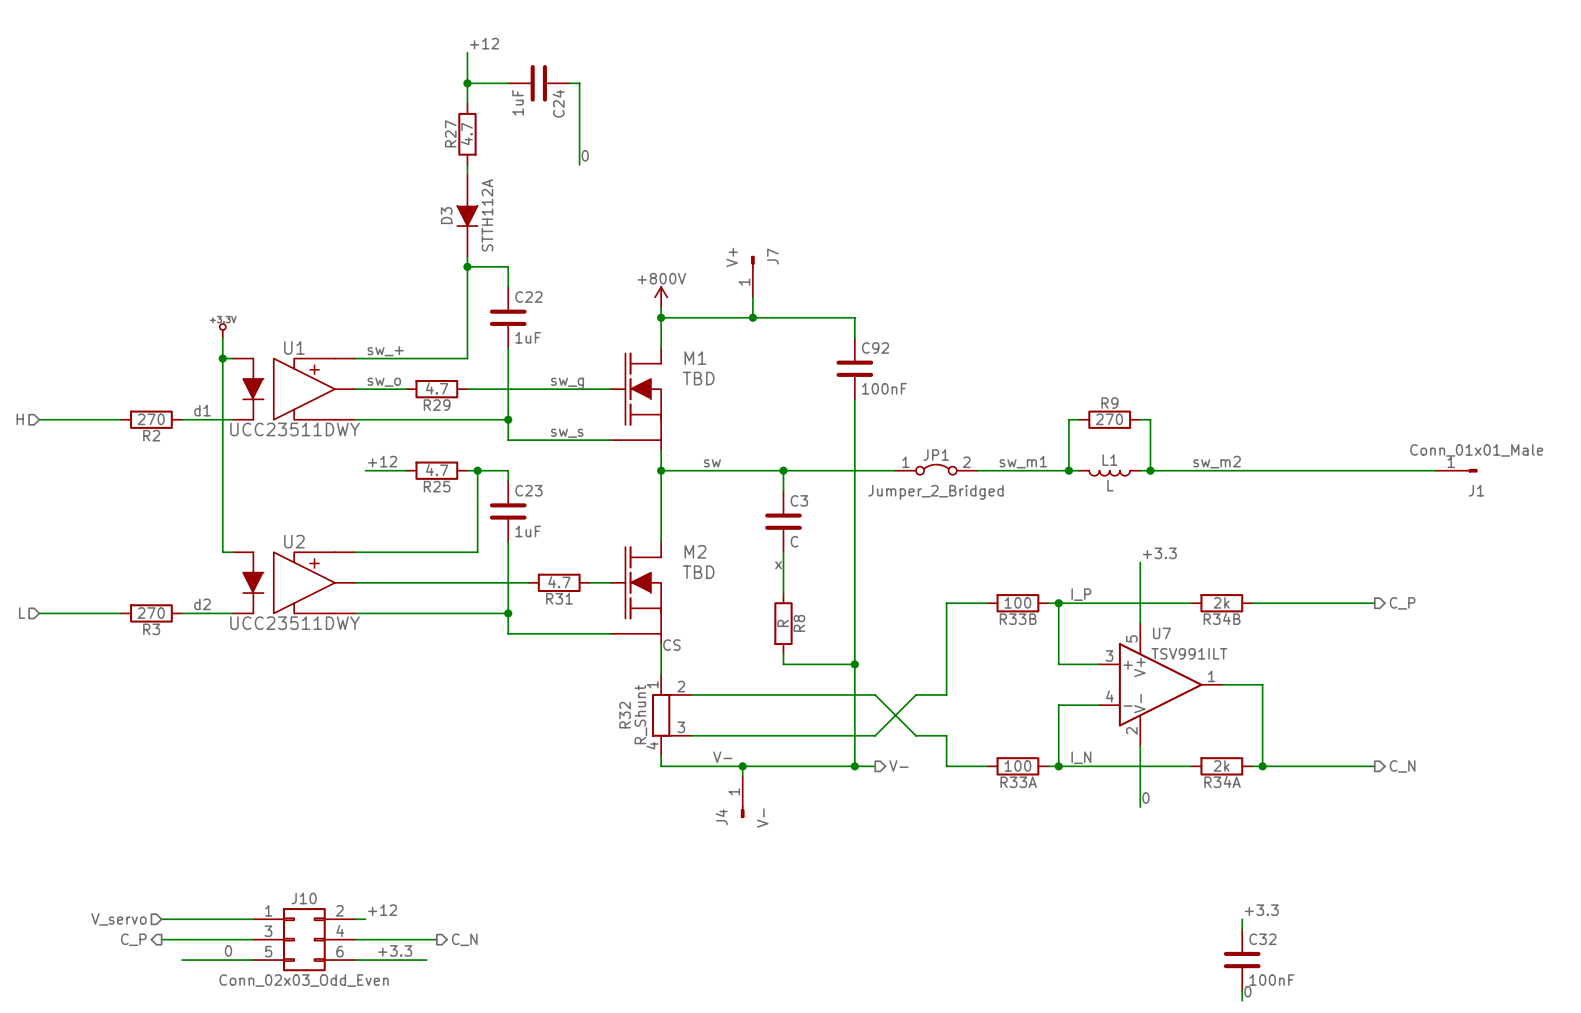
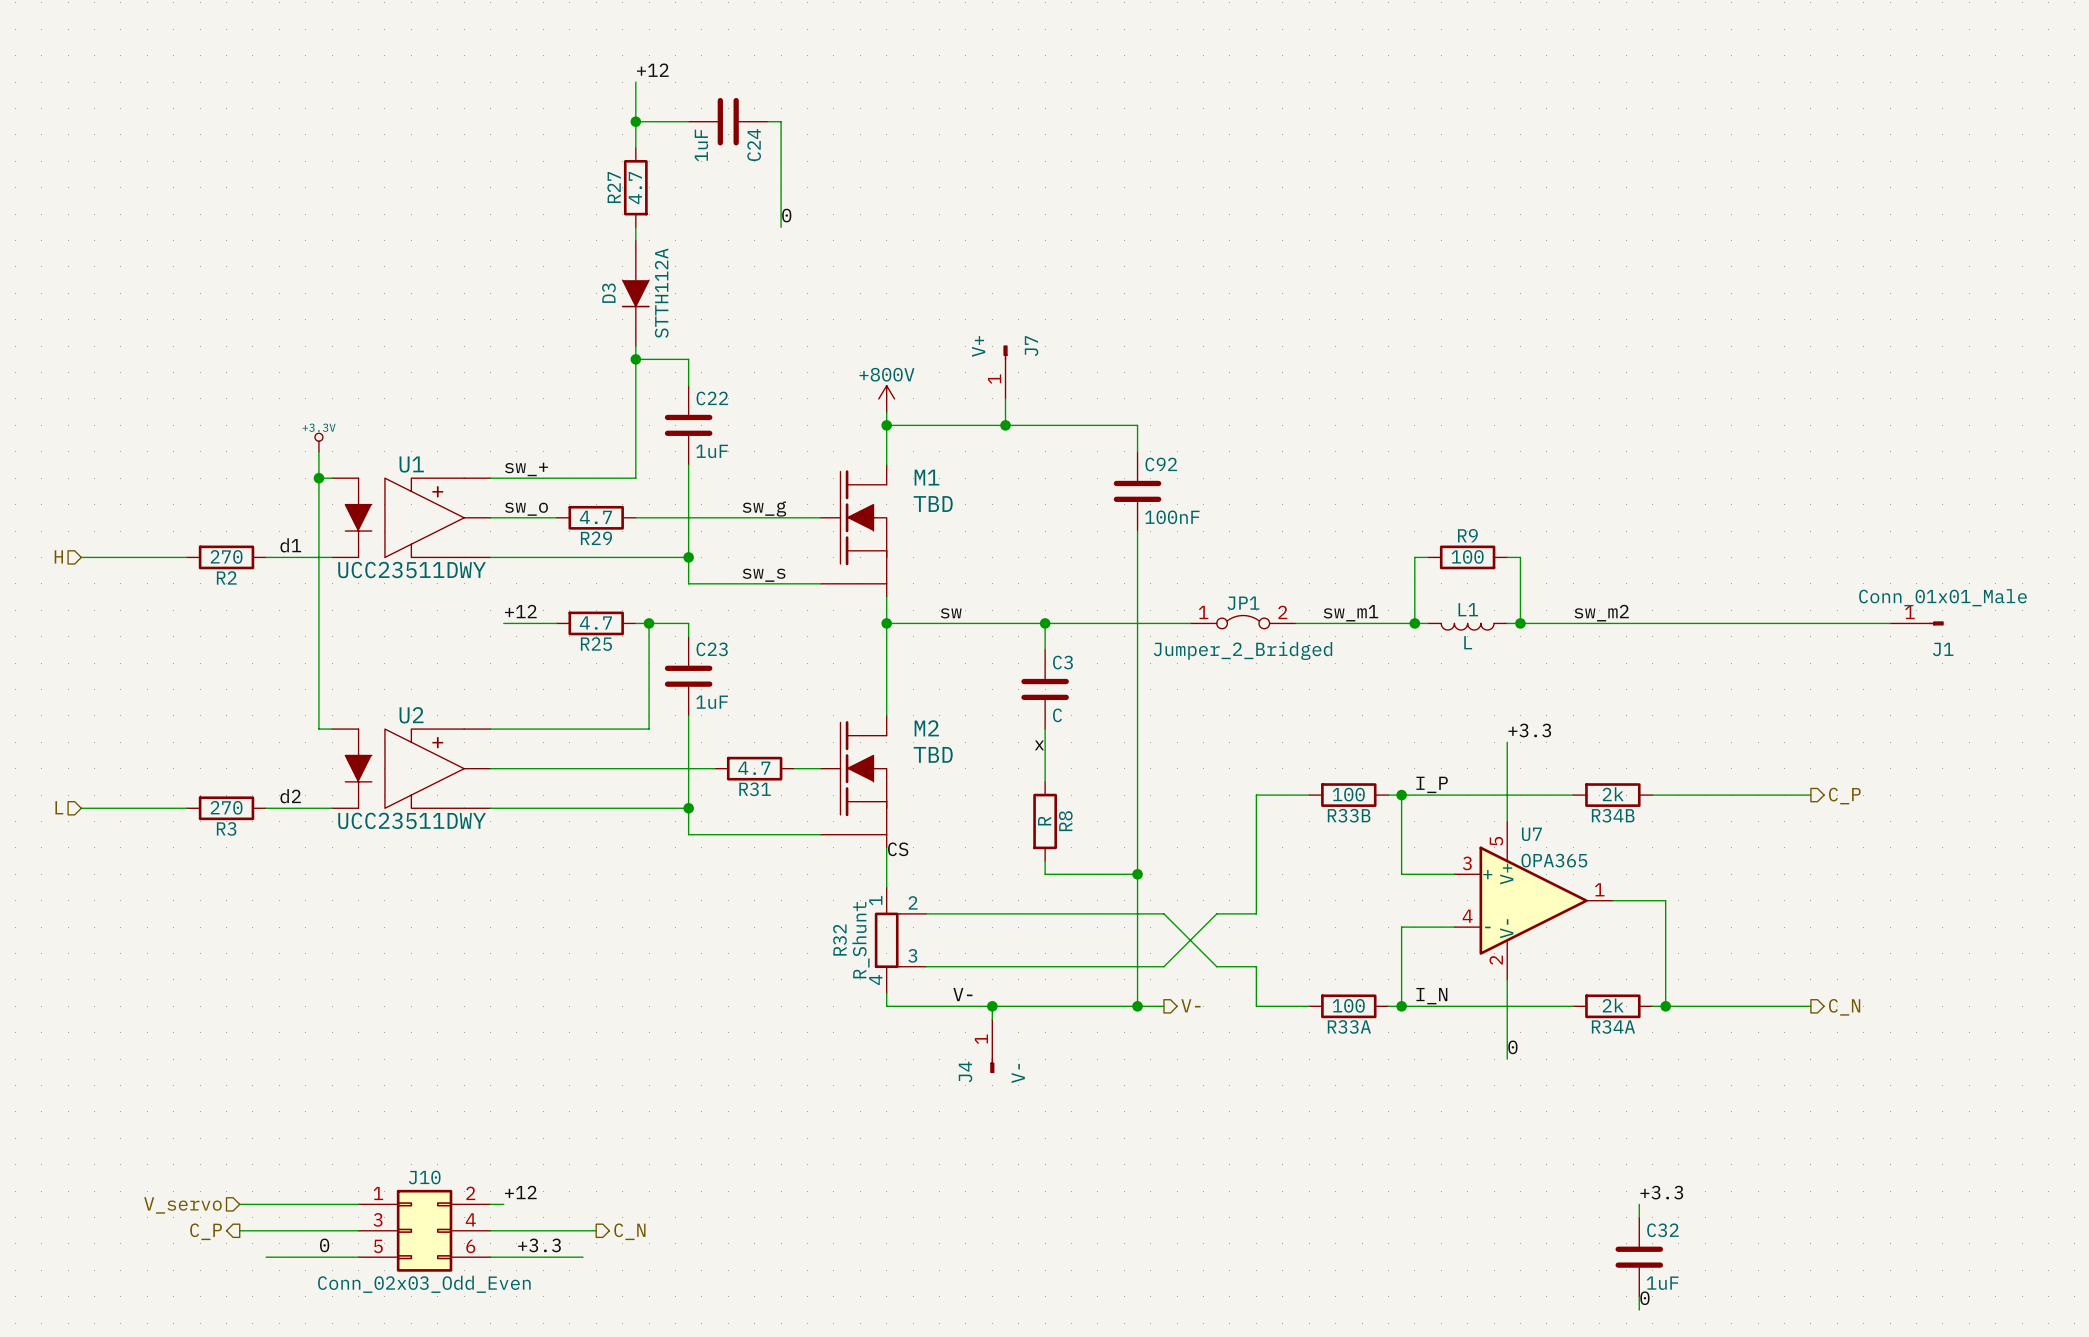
R9 value: 270 (1109, 419) -> 100 (1467, 556)
U7 value: TSV991ILT (1189, 653) -> OPA365 (1554, 860)
C32 value: 100nF (1271, 980) -> 1uF (1662, 1283)

